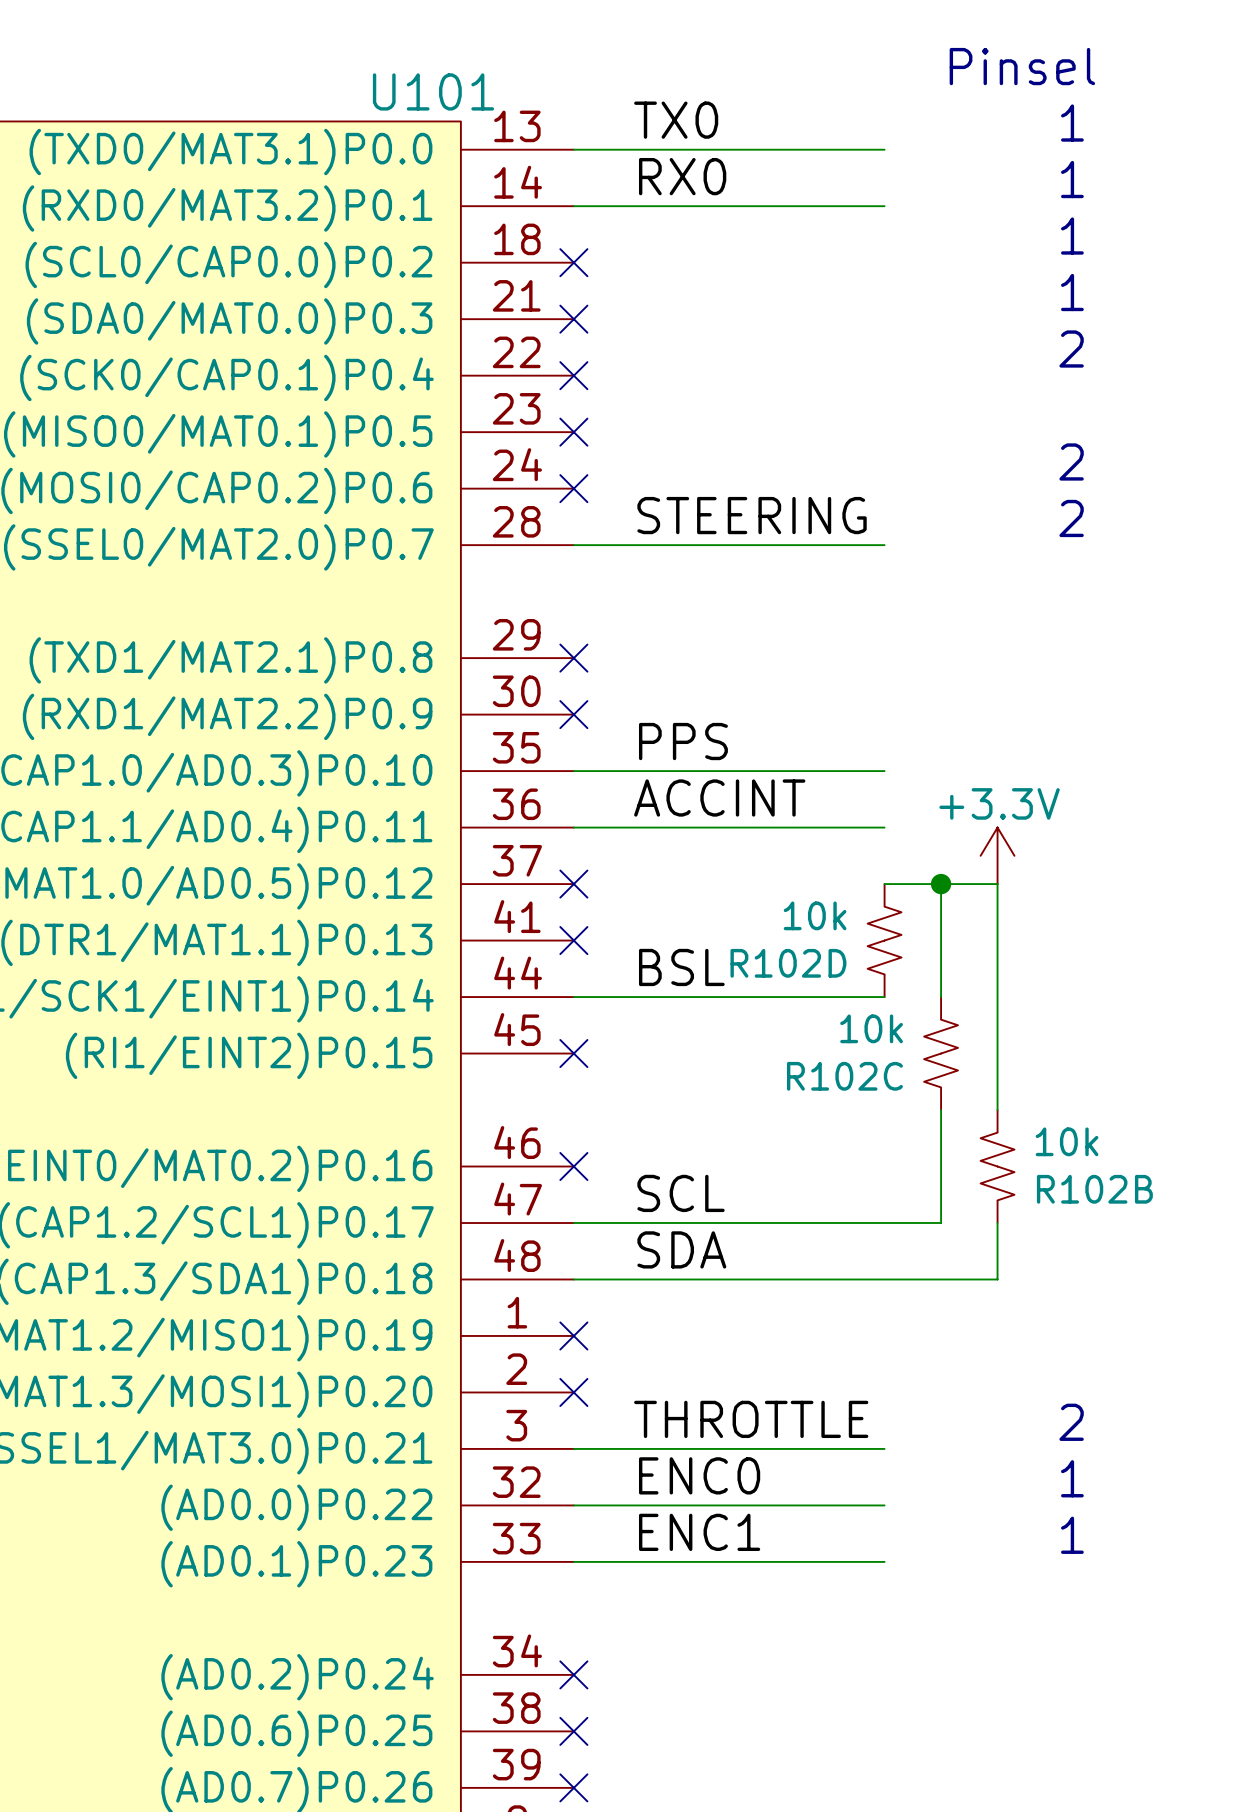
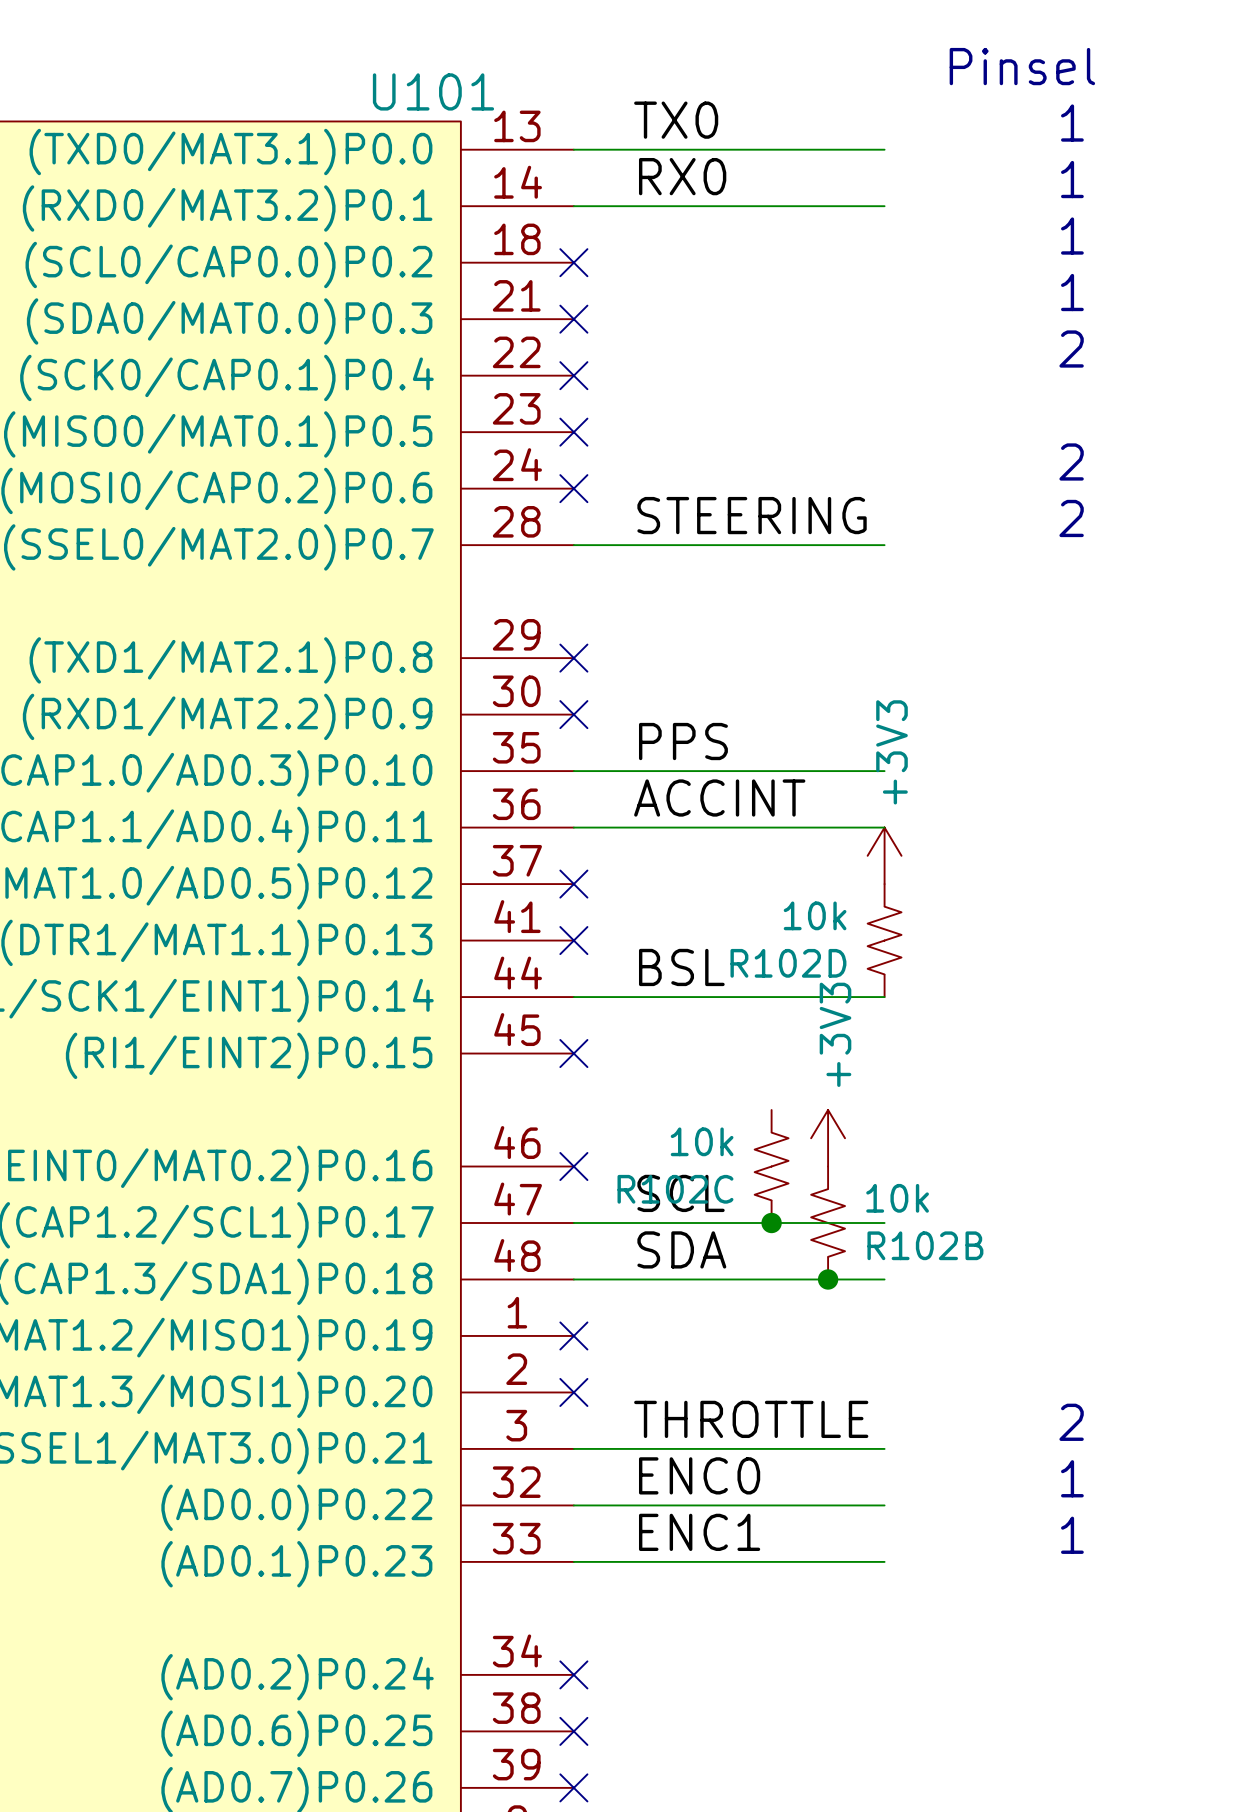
power symbol: none -> +3V3 (884, 855)
power symbol: +3.3V (997, 855) -> none
wire: (884, 884) (997, 884) (997, 1110) -> none
wire: (941, 884) (941, 997) -> none
junction: (941, 884) -> none
R102C position: (941, 1053) -> (771, 1166)
wire: (941, 1110) (941, 1223) (884, 1223) -> none
power symbol: none -> +3V3 (828, 1138)
R102B position: (997, 1166) -> (828, 1223)
junction: none -> (771, 1223)
wire: (997, 1223) (997, 1279) (884, 1279) -> none
junction: none -> (828, 1279)

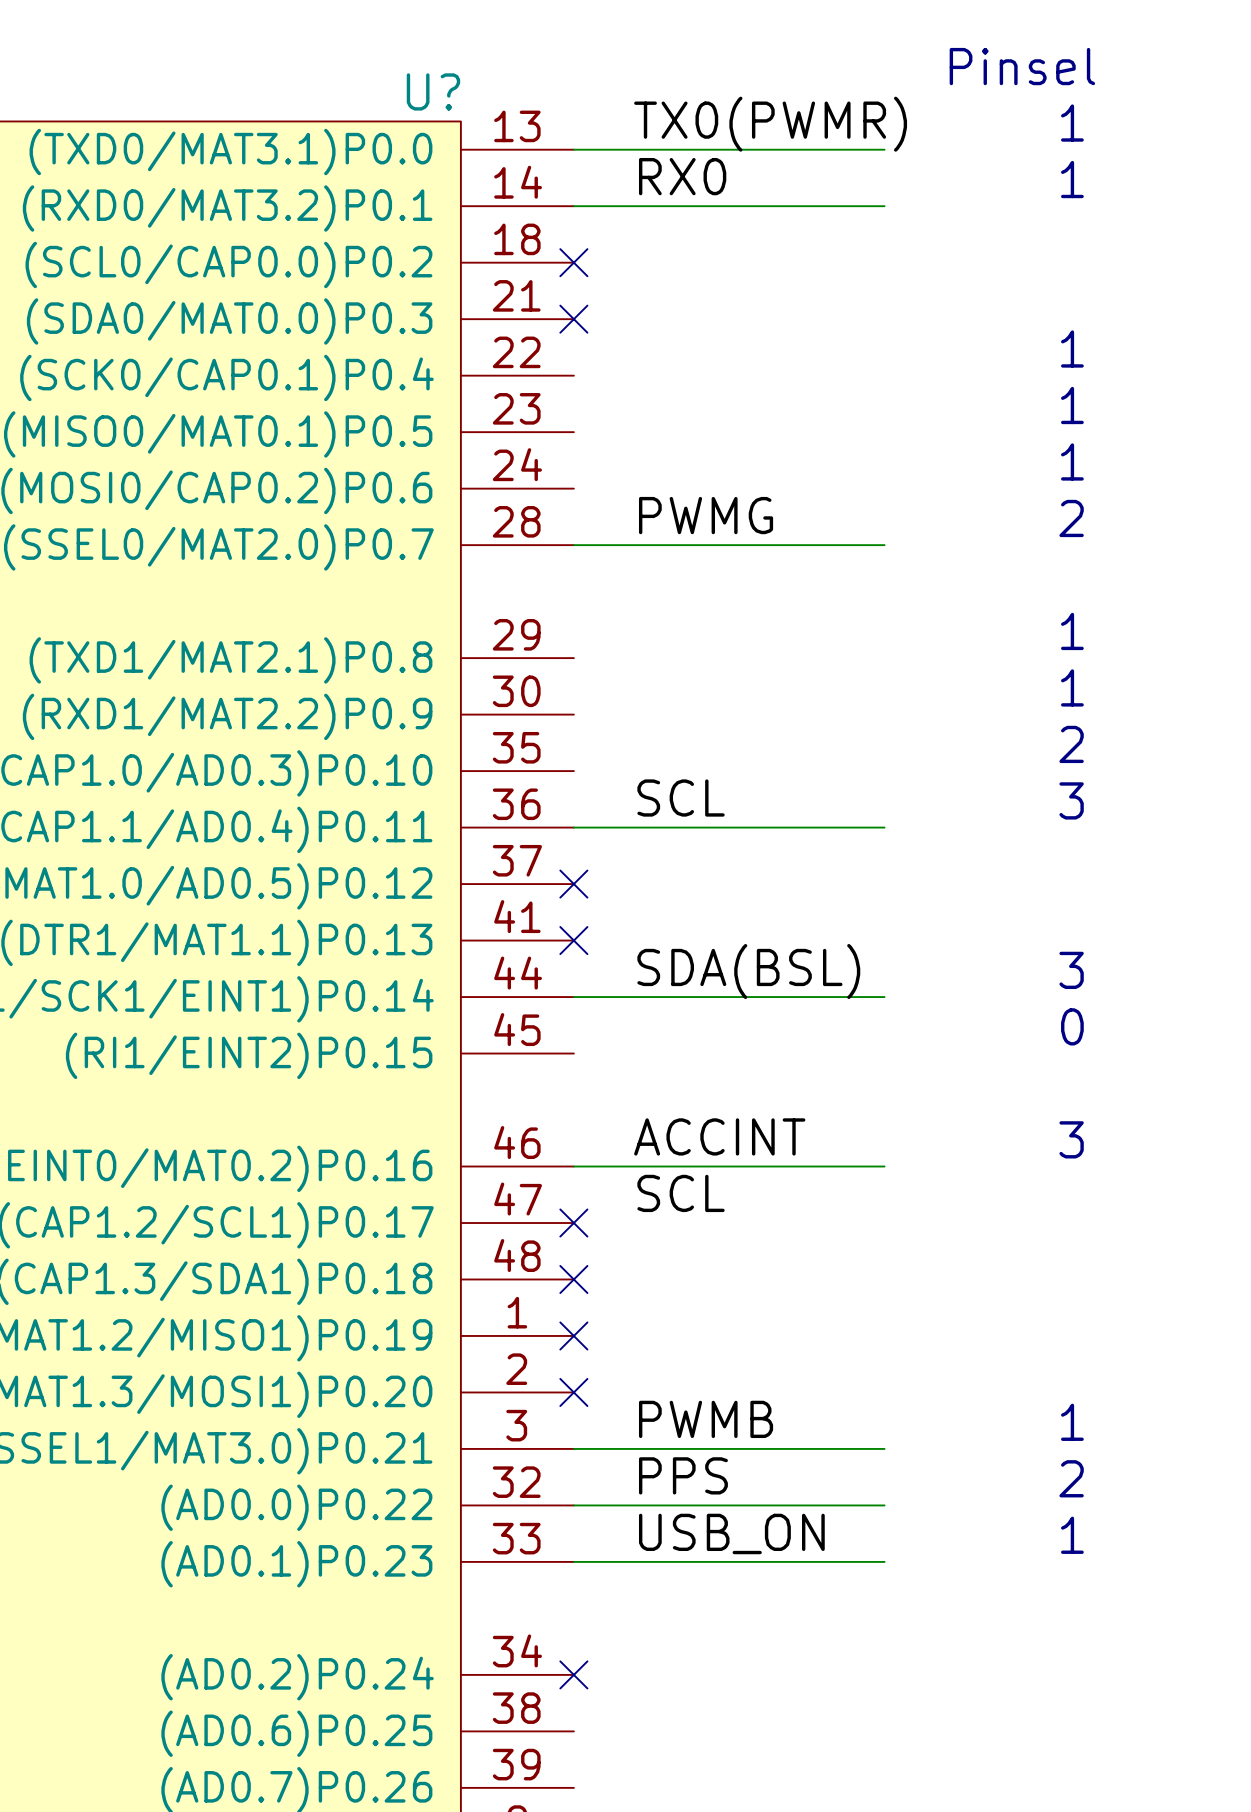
U101 name: U101 (433, 91) -> U? (433, 91)
label: TX0 (676, 120) -> TX0(PWMR) (770, 124)
text: 1 (1072, 236) -> none
text: 1 (1072, 292) -> none
text: 2 (1071, 349) -> 1 (1072, 349)
no-connect mark: (573, 375) -> none
text: none -> 1 (1072, 405)
no-connect mark: (573, 432) -> none
text: 2 (1071, 461) -> 1 (1072, 461)
no-connect mark: (573, 488) -> none
label: STEERING (752, 515) -> PWMG (706, 515)
text: none -> 1 (1072, 631)
no-connect mark: (573, 658) -> none
text: none -> 1 (1072, 687)
no-connect mark: (573, 714) -> none
label: PPS (683, 741) -> none
text: none -> 2 (1071, 744)
wire: (573, 771) (884, 771) -> none
label: ACCINT (719, 798) -> SCL (681, 798)
text: none -> 3 (1071, 800)
power symbol: +3V3 (884, 855) -> none
R102D: 10k (884, 940) -> none
label: BSL (681, 967) -> SDA(BSL) (748, 971)
text: none -> 3 (1071, 970)
text: none -> 0 (1072, 1026)
no-connect mark: (573, 1053) -> none
label: none -> ACCINT (719, 1136)
power symbol: +3V3 (828, 1138) -> none
text: none -> 3 (1071, 1139)
no-connect mark: (573, 1166) -> none
R102C: 10k (771, 1166) -> none
wire: (573, 1223) (884, 1223) -> (573, 1166) (884, 1166)
no-connect mark: none -> (573, 1223)
junction: (771, 1223) -> none
R102B: 10k (828, 1223) -> none
label: SDA (681, 1249) -> none
wire: (573, 1279) (884, 1279) -> none
no-connect mark: none -> (573, 1279)
junction: (828, 1279) -> none
label: THROTTLE (751, 1419) -> PWMB (706, 1419)
text: 2 (1071, 1422) -> 1 (1072, 1422)
label: ENC0 (699, 1475) -> PPS (683, 1475)
text: 1 (1072, 1478) -> 2 (1071, 1478)
label: ENC1 (699, 1532) -> USB_ON (731, 1533)
no-connect mark: (573, 1731) -> none
no-connect mark: (573, 1787) -> none

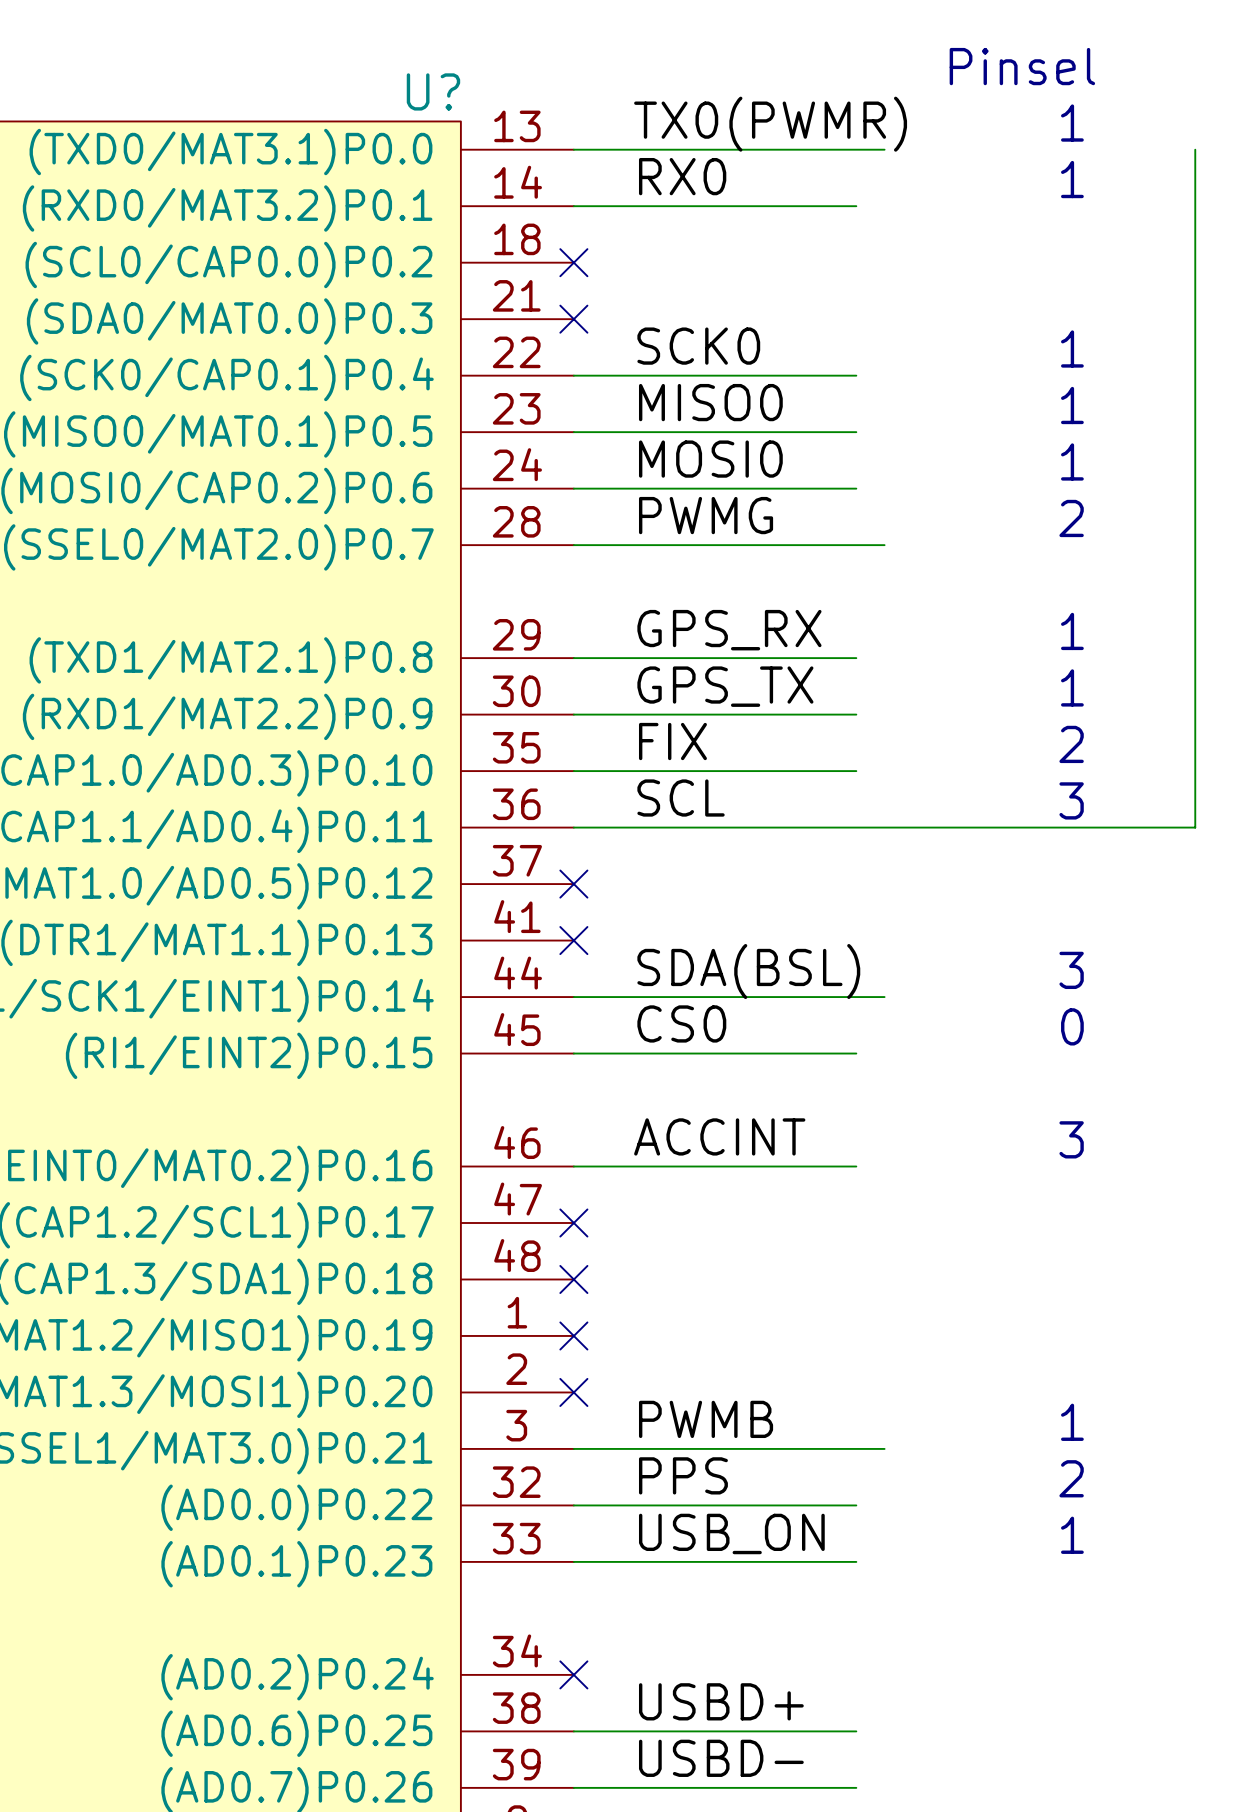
wire: none -> (1195, 149) (1195, 827) (884, 827)
wire: (856, 206) (884, 206) -> none
label: none -> SCK0 (698, 346)
wire: none -> (573, 375) (856, 375)
label: none -> MISO0 (710, 402)
wire: none -> (573, 432) (856, 432)
label: none -> MOSI0 (710, 459)
wire: none -> (573, 488) (856, 488)
label: none -> GPS_RX (729, 630)
wire: none -> (573, 658) (856, 658)
label: none -> GPS_TX (725, 686)
wire: none -> (573, 714) (856, 714)
label: none -> FIX (672, 741)
wire: none -> (573, 771) (856, 771)
label: none -> CS0 (681, 1023)
wire: none -> (573, 1053) (856, 1053)
wire: (856, 1166) (884, 1166) -> none
label: SCL (681, 1193) -> none
wire: (856, 1505) (884, 1505) -> none
wire: (856, 1561) (884, 1561) -> none
label: none -> USBD+ (721, 1701)
wire: none -> (573, 1731) (856, 1731)
label: none -> USBD- (721, 1758)
wire: none -> (573, 1787) (856, 1787)

